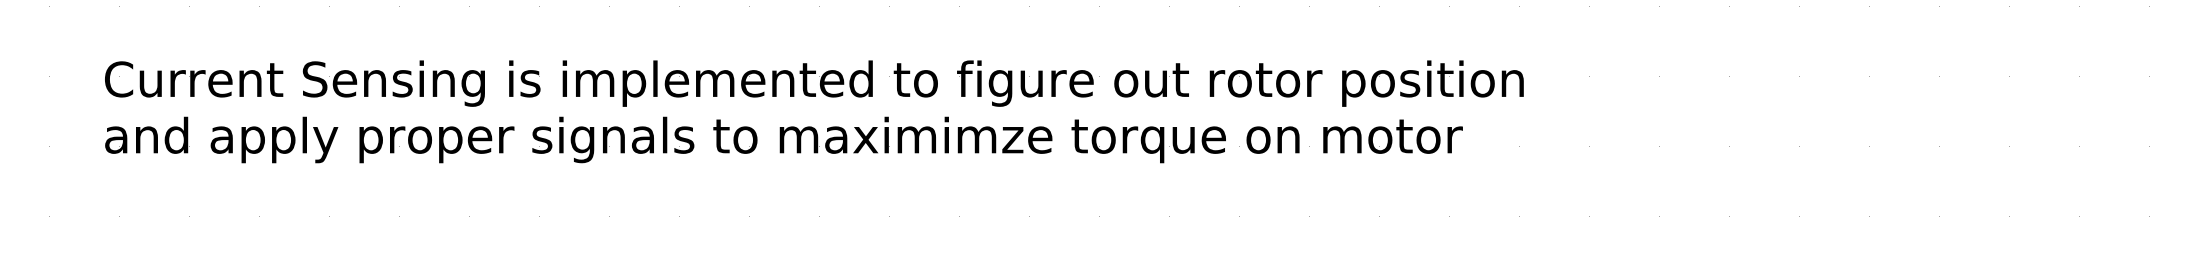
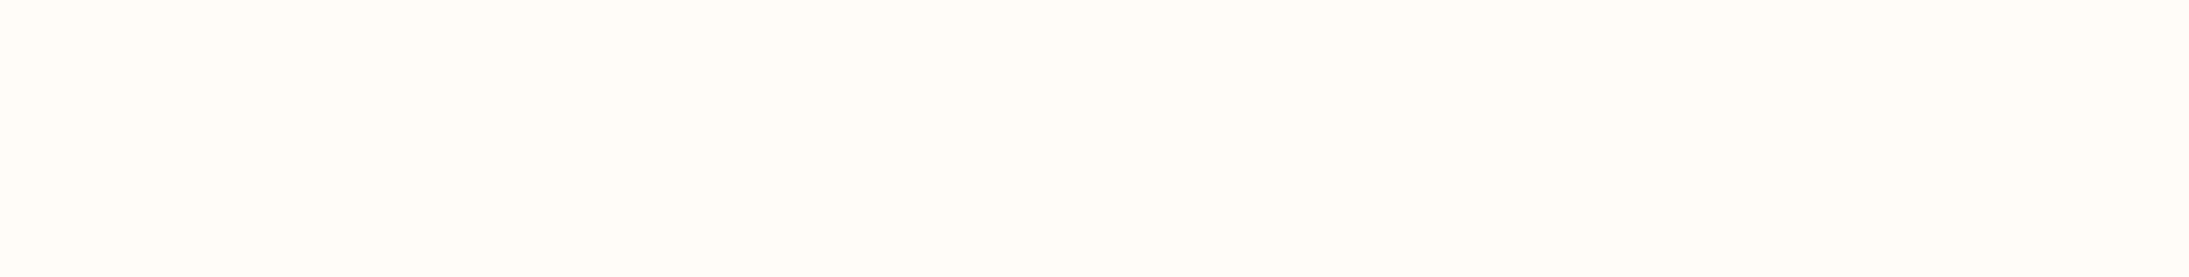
text: Current Sensing is implemented to figure out rotor position (814, 83) -> none
text: and apply proper signals to maximimze torque on motor (784, 140) -> none

